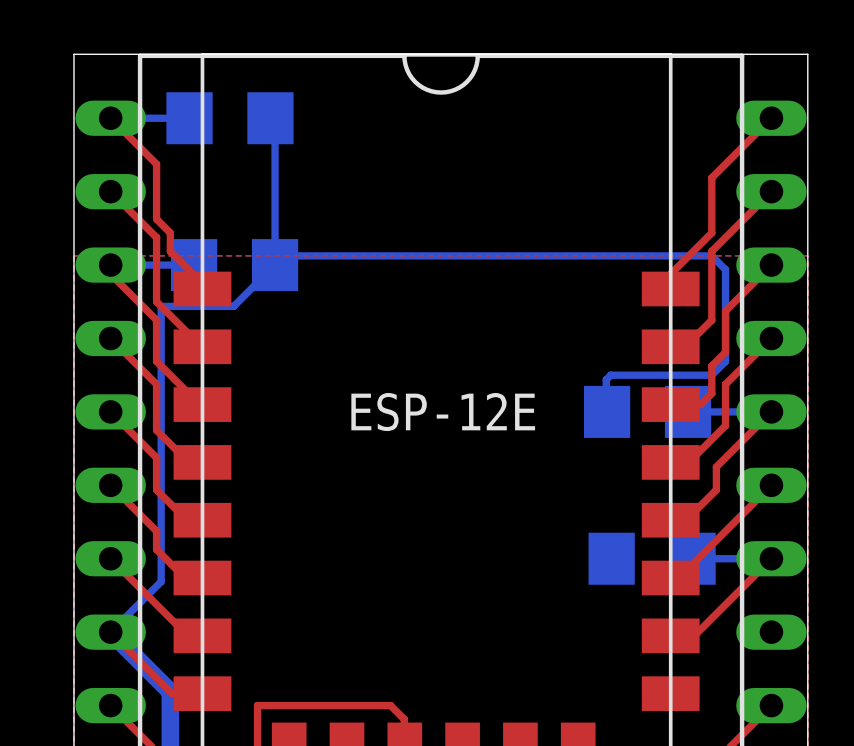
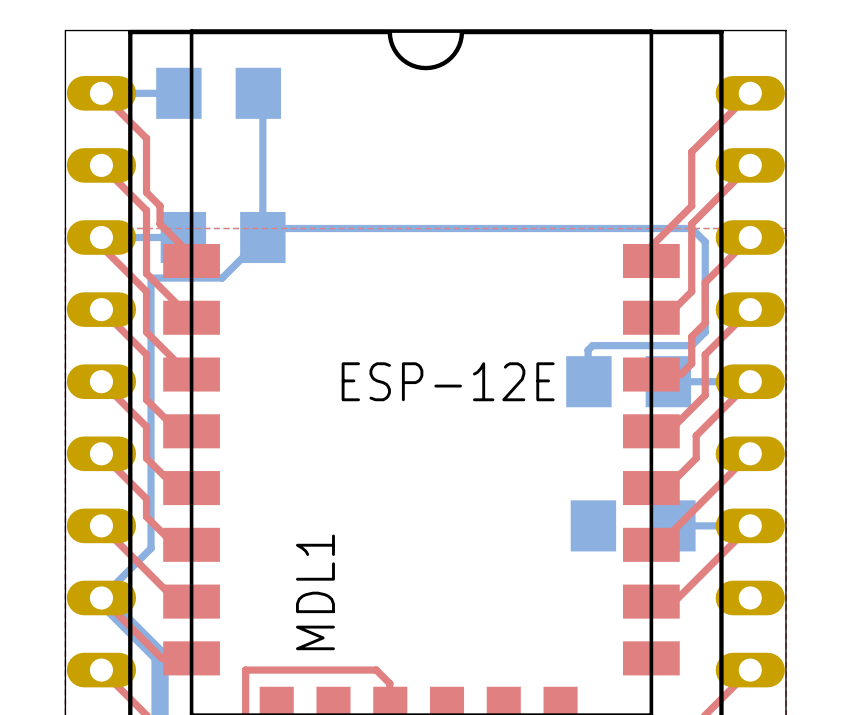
MDL1 name: none -> MDL1 (315, 592)

